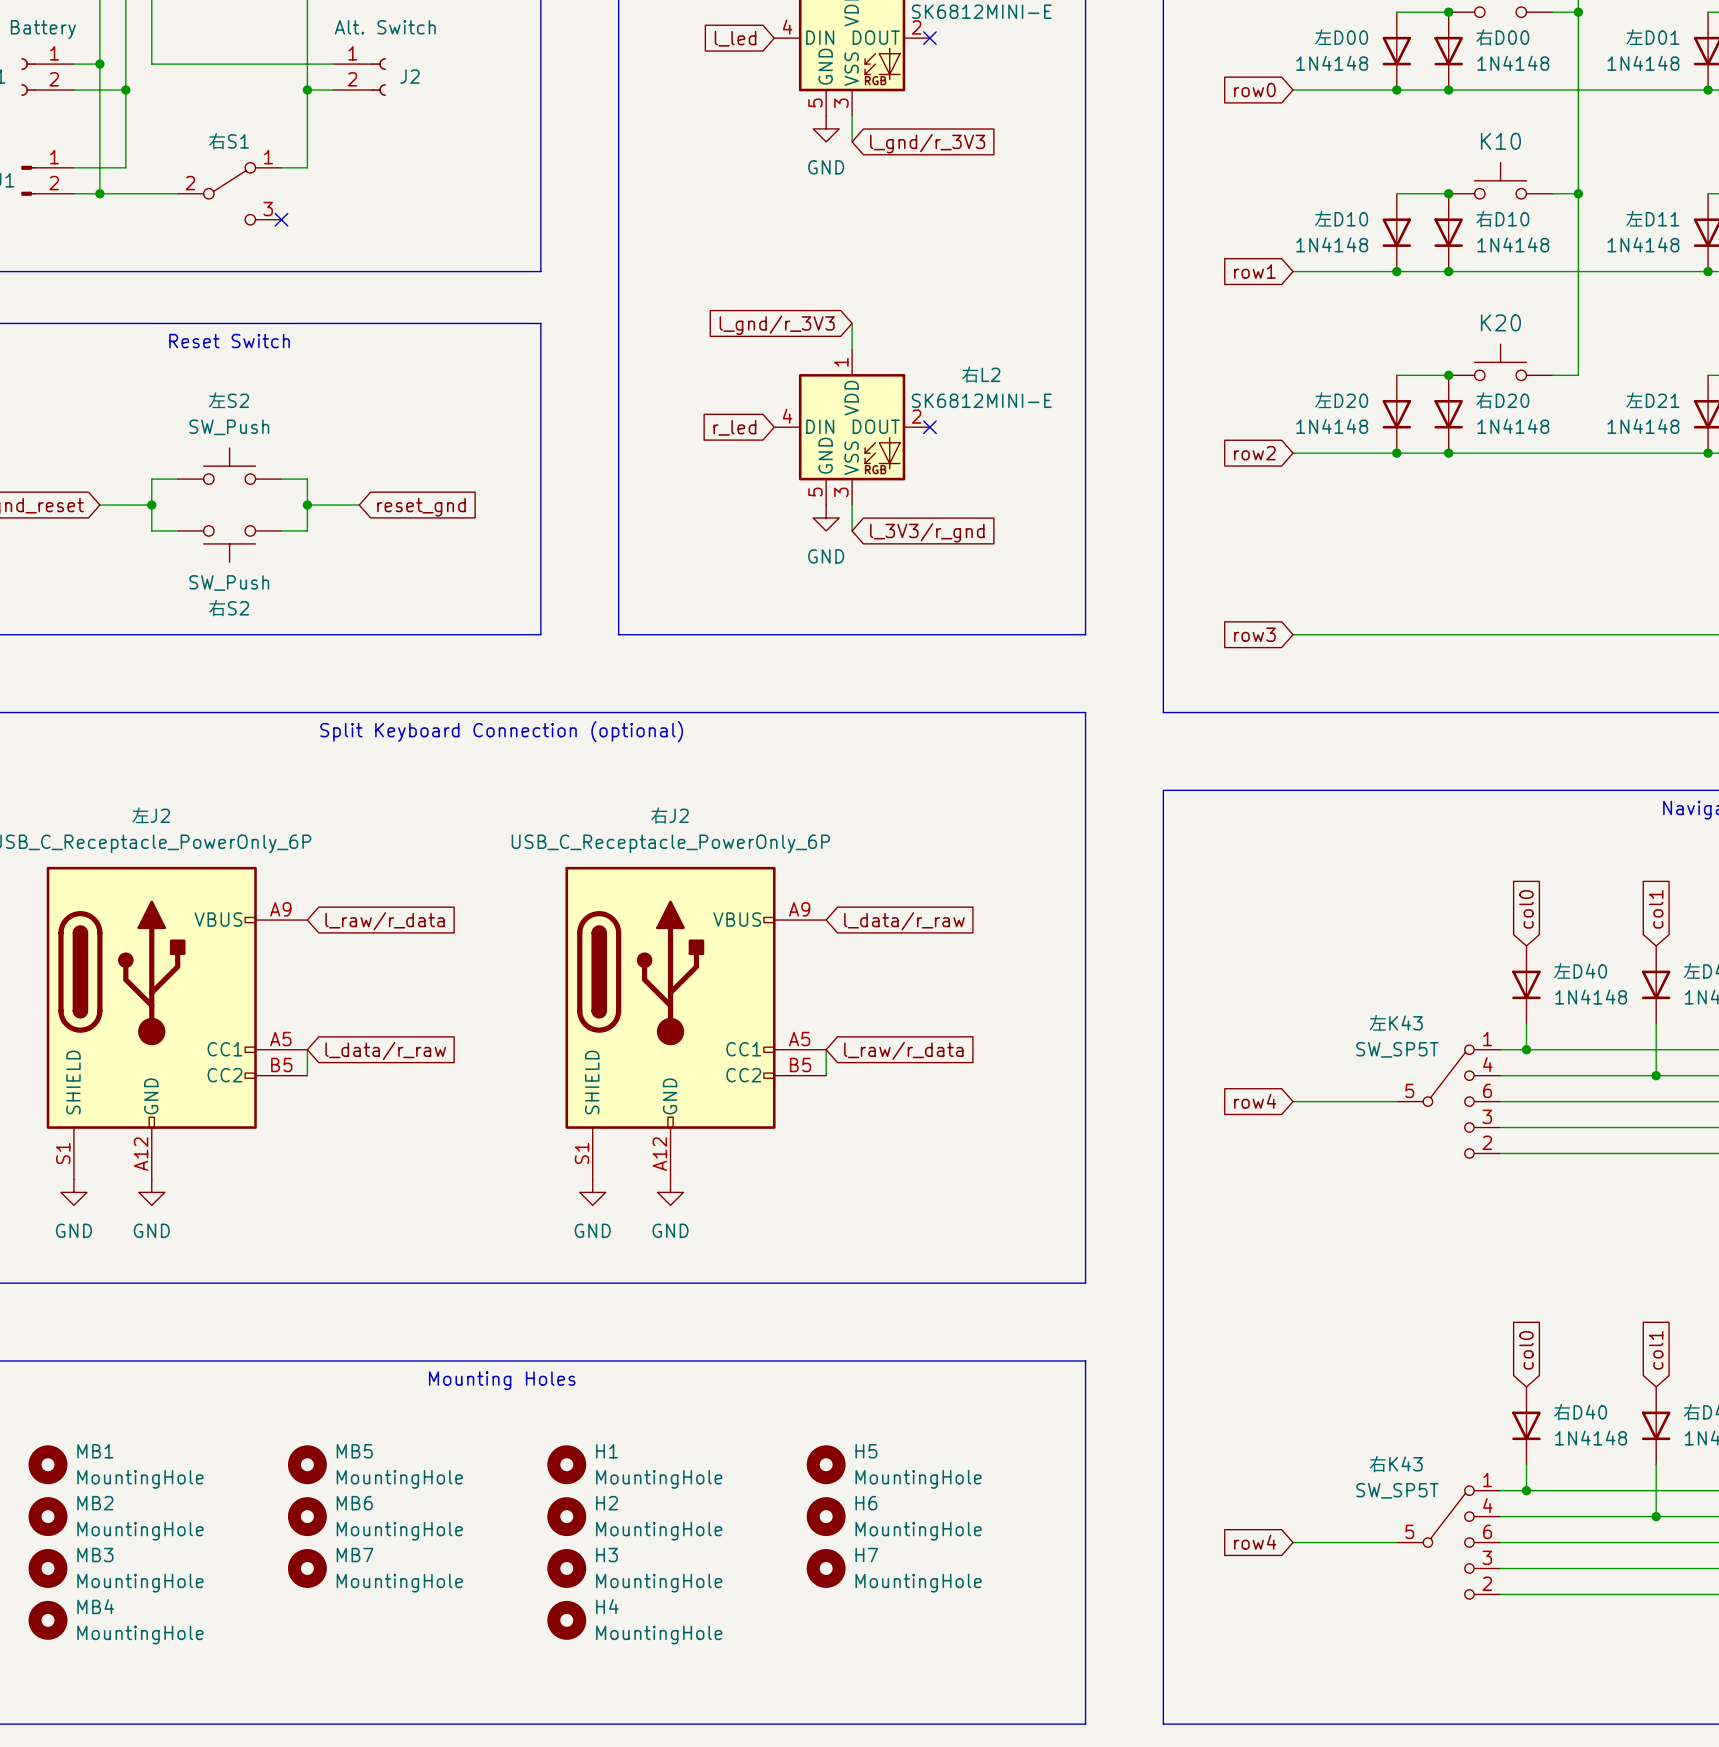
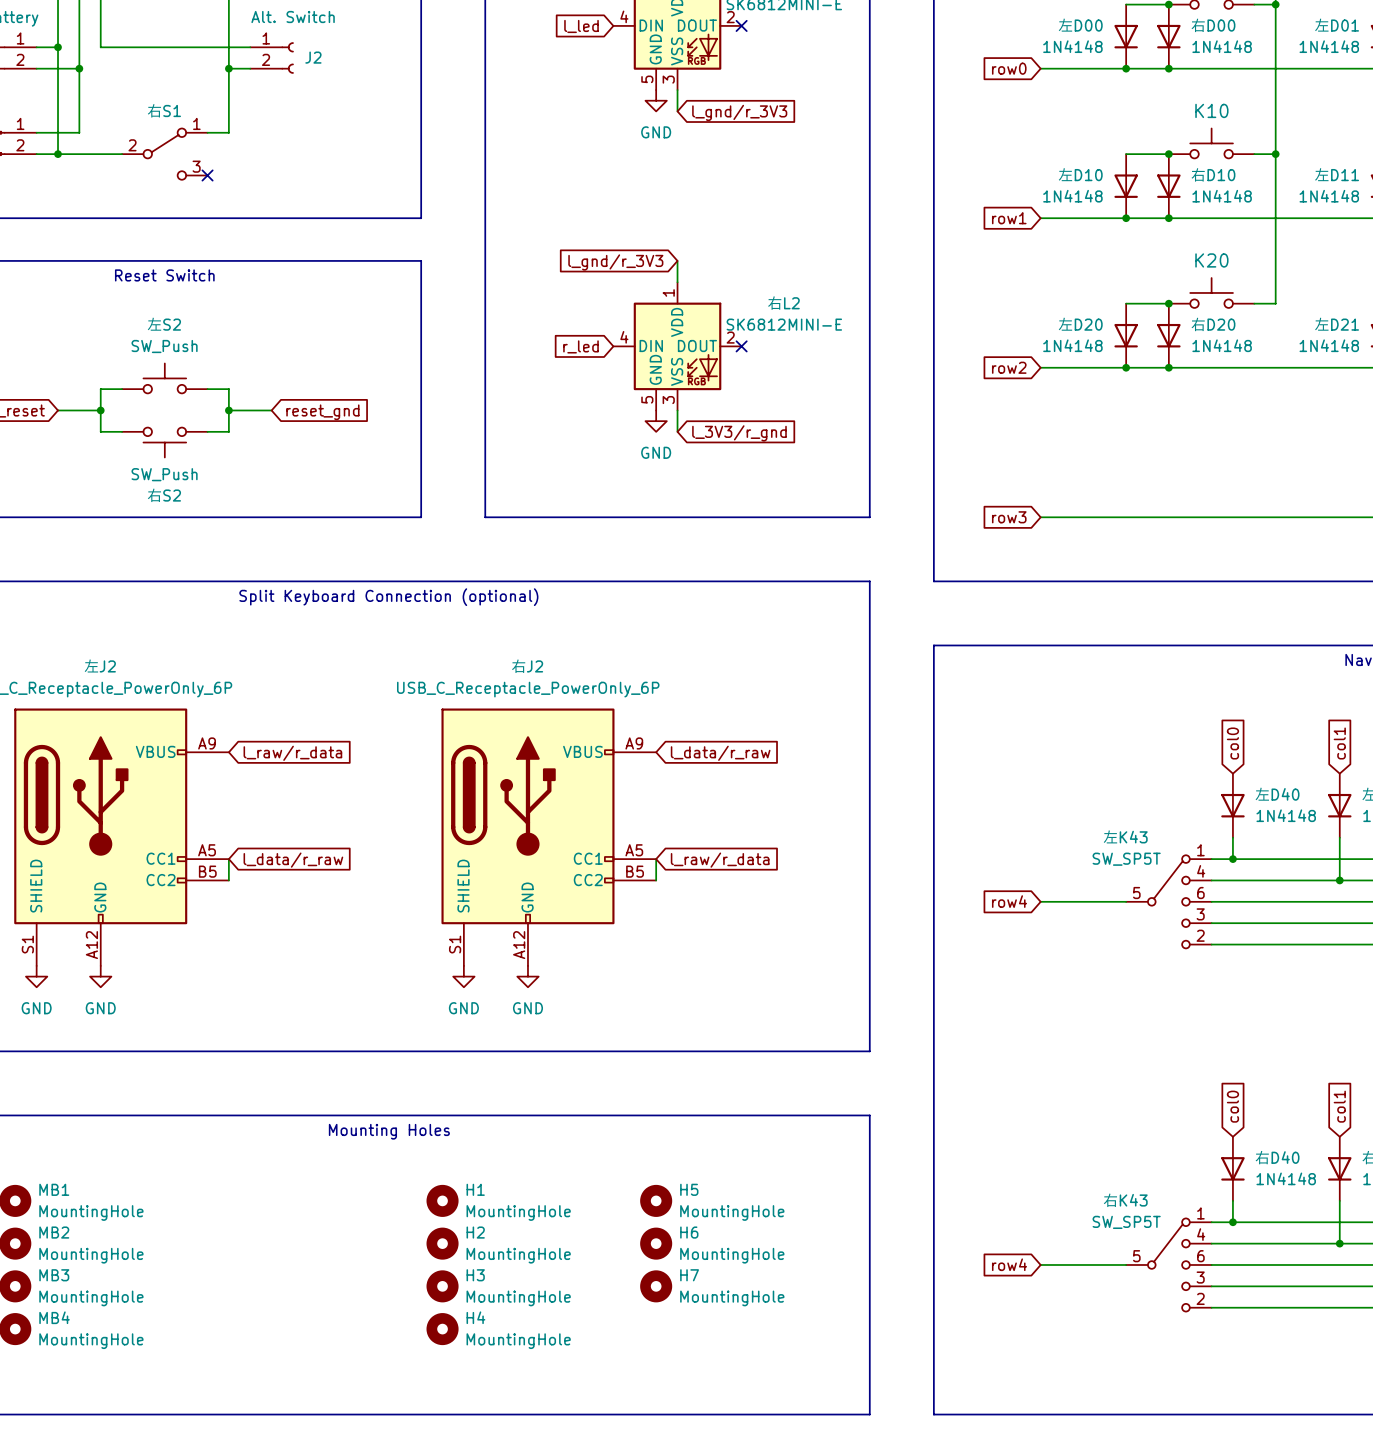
MB5: MountingHole (307, 1464) -> none
MB6: MountingHole (307, 1516) -> none
MB7: MountingHole (307, 1568) -> none

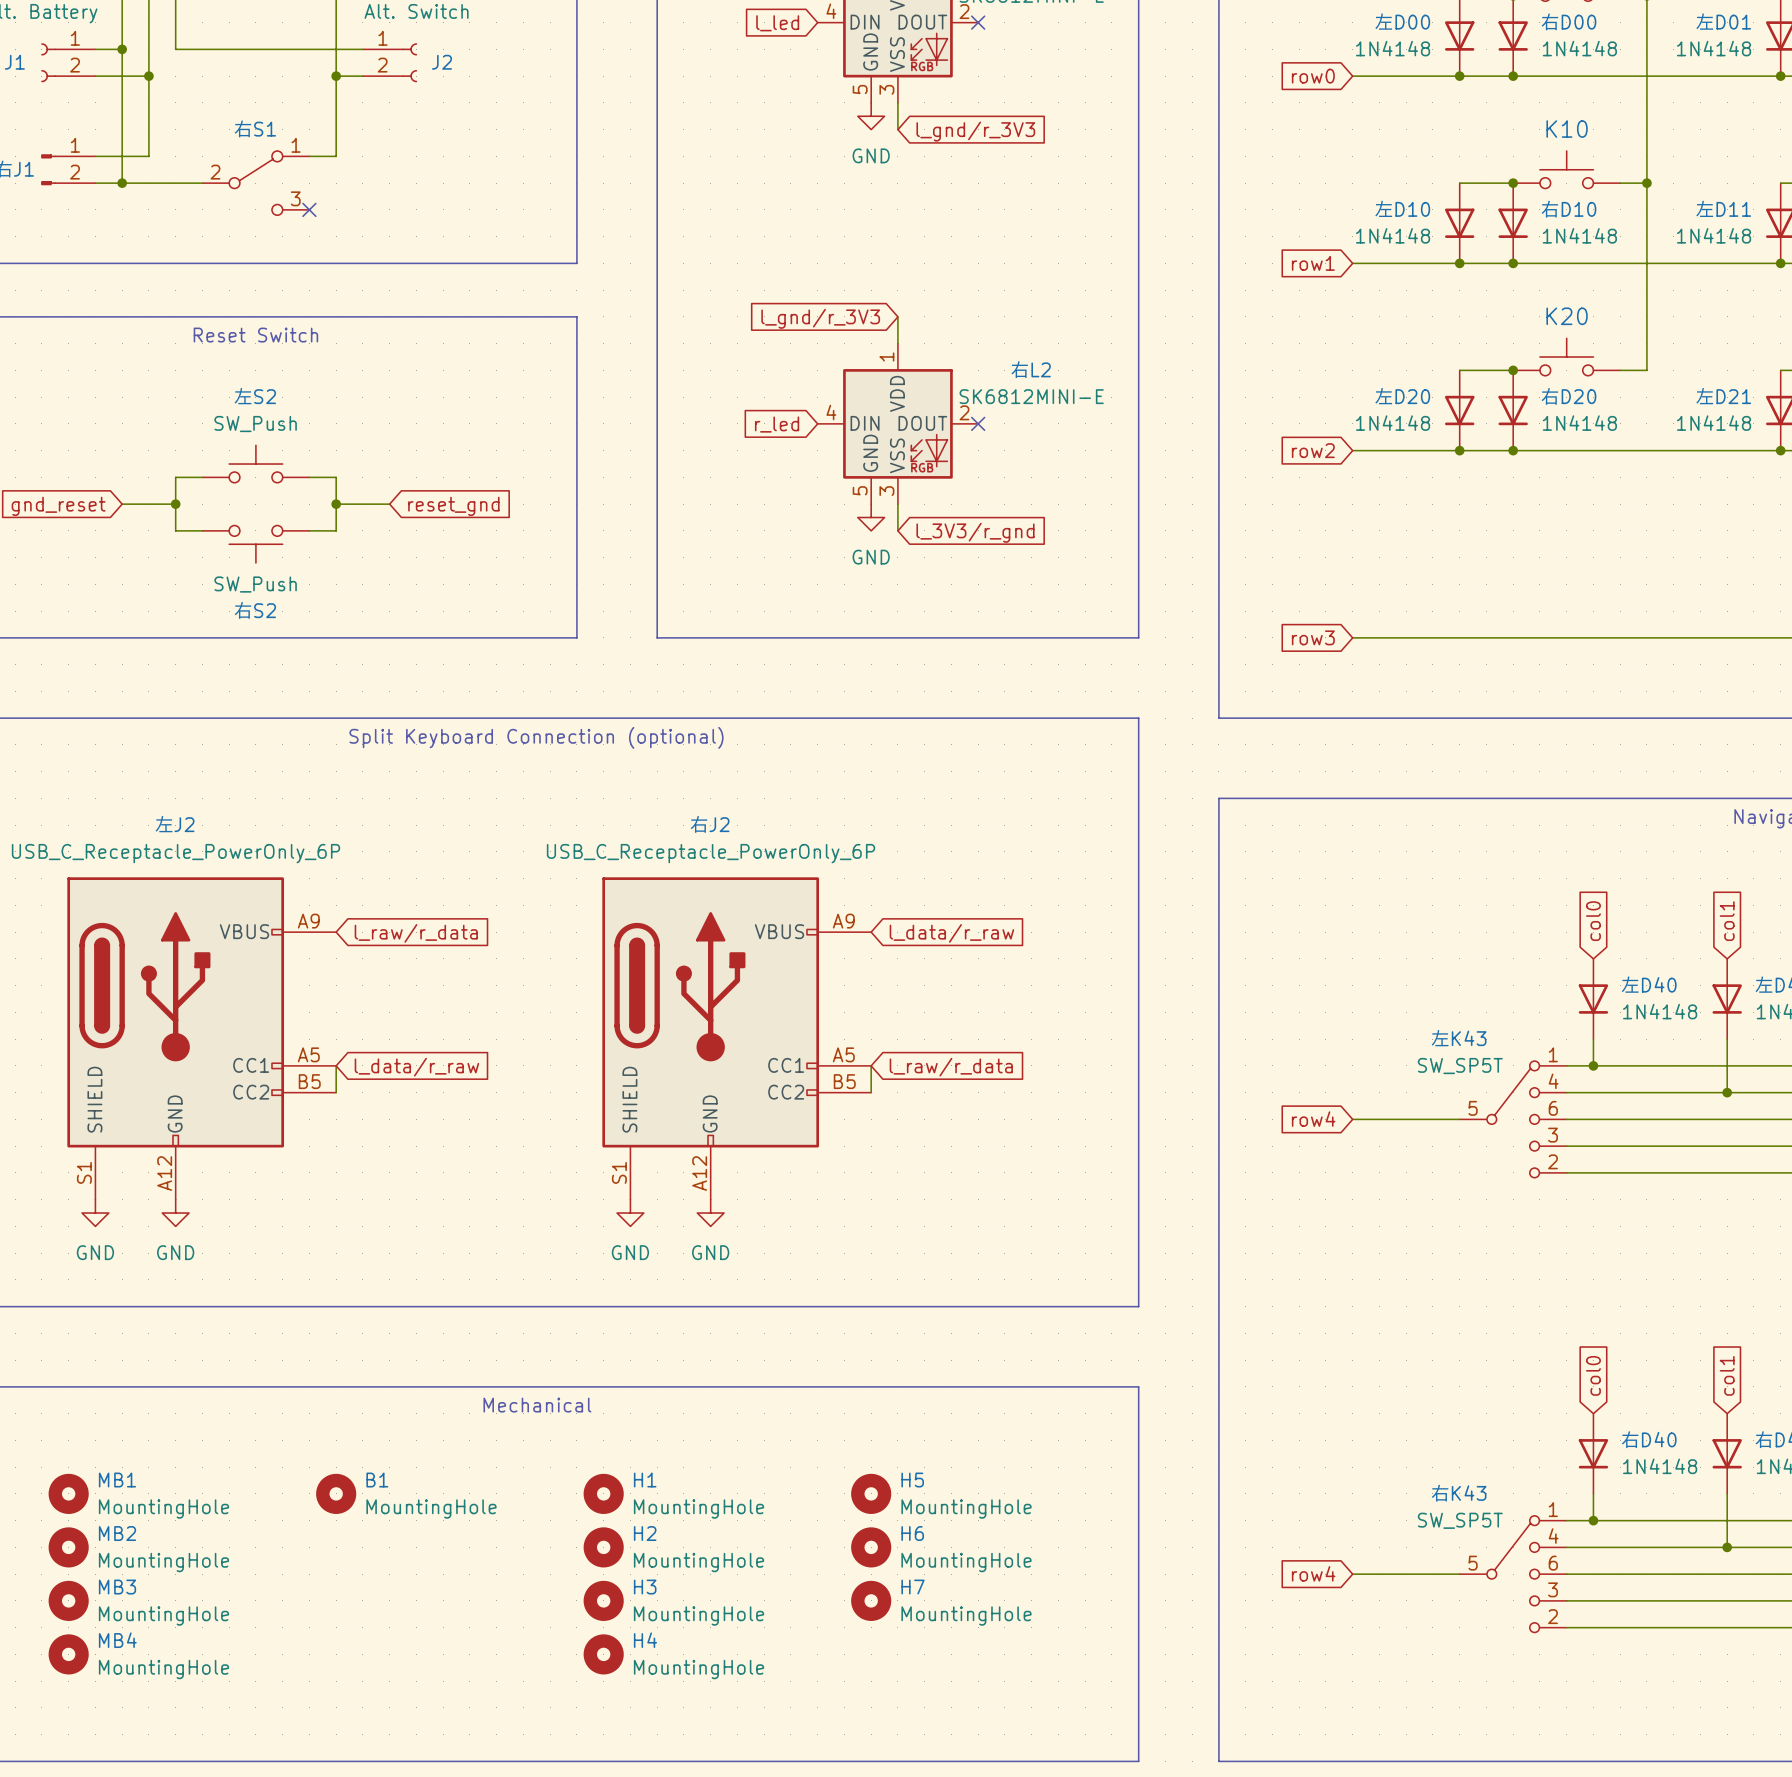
text: Mounting Holes (389, 1131) -> Mechanical (537, 1405)
B1: none -> MountingHole (336, 1493)

